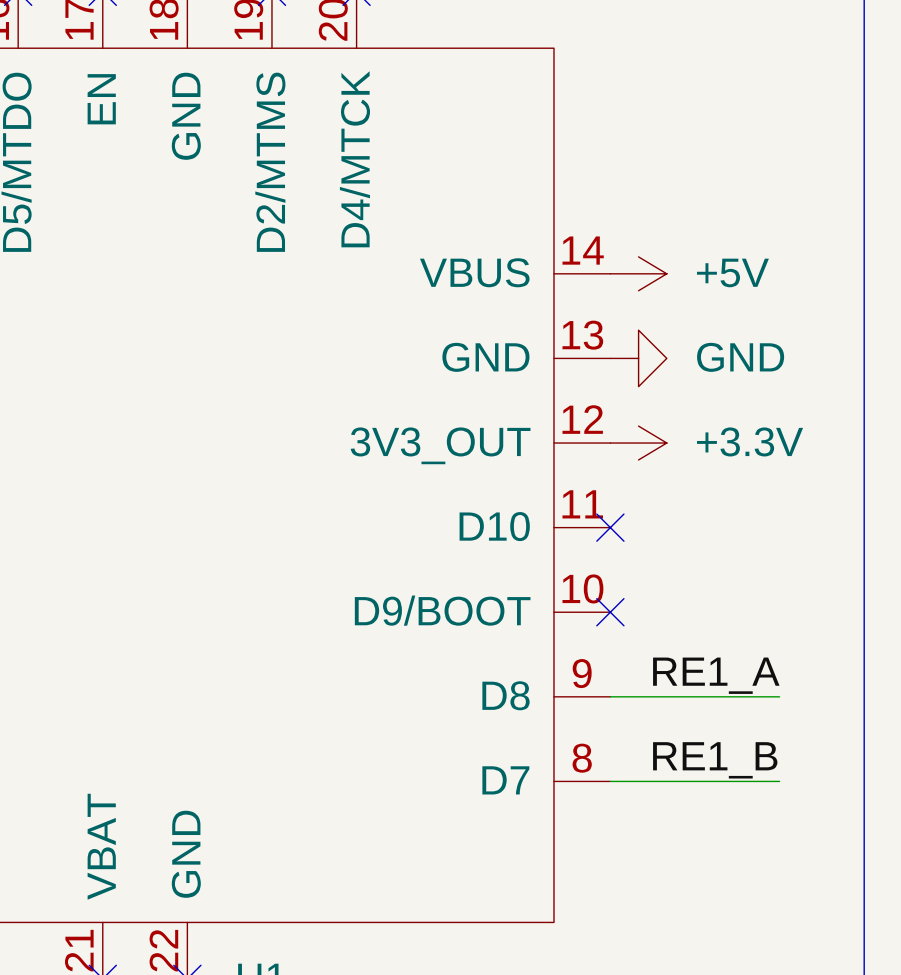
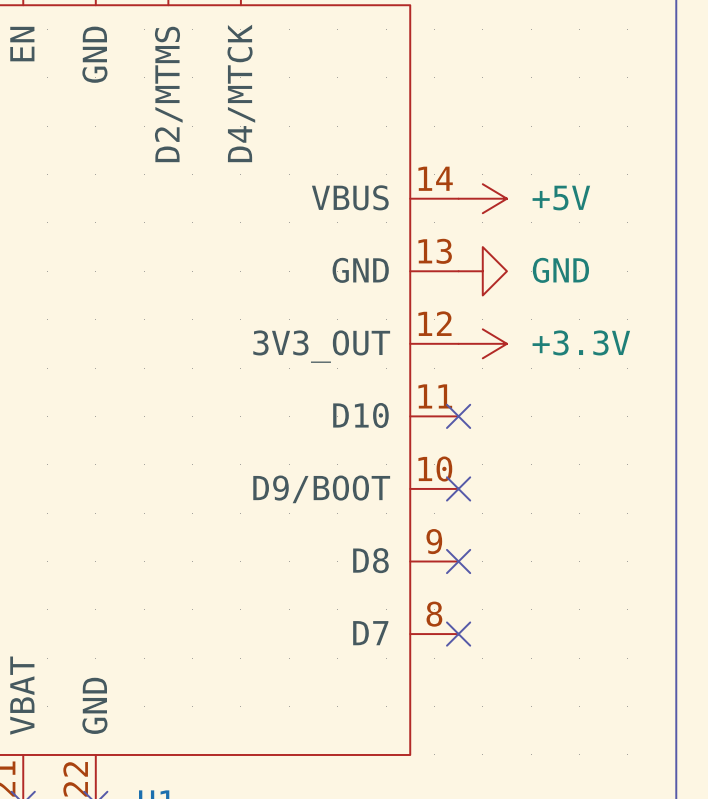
label: RE1_A (716, 675) -> none
wire: (610, 696) (779, 696) -> none
no-connect mark: none -> (458, 561)
label: RE1_B (715, 760) -> none
wire: (610, 781) (779, 781) -> none
no-connect mark: none -> (458, 634)

